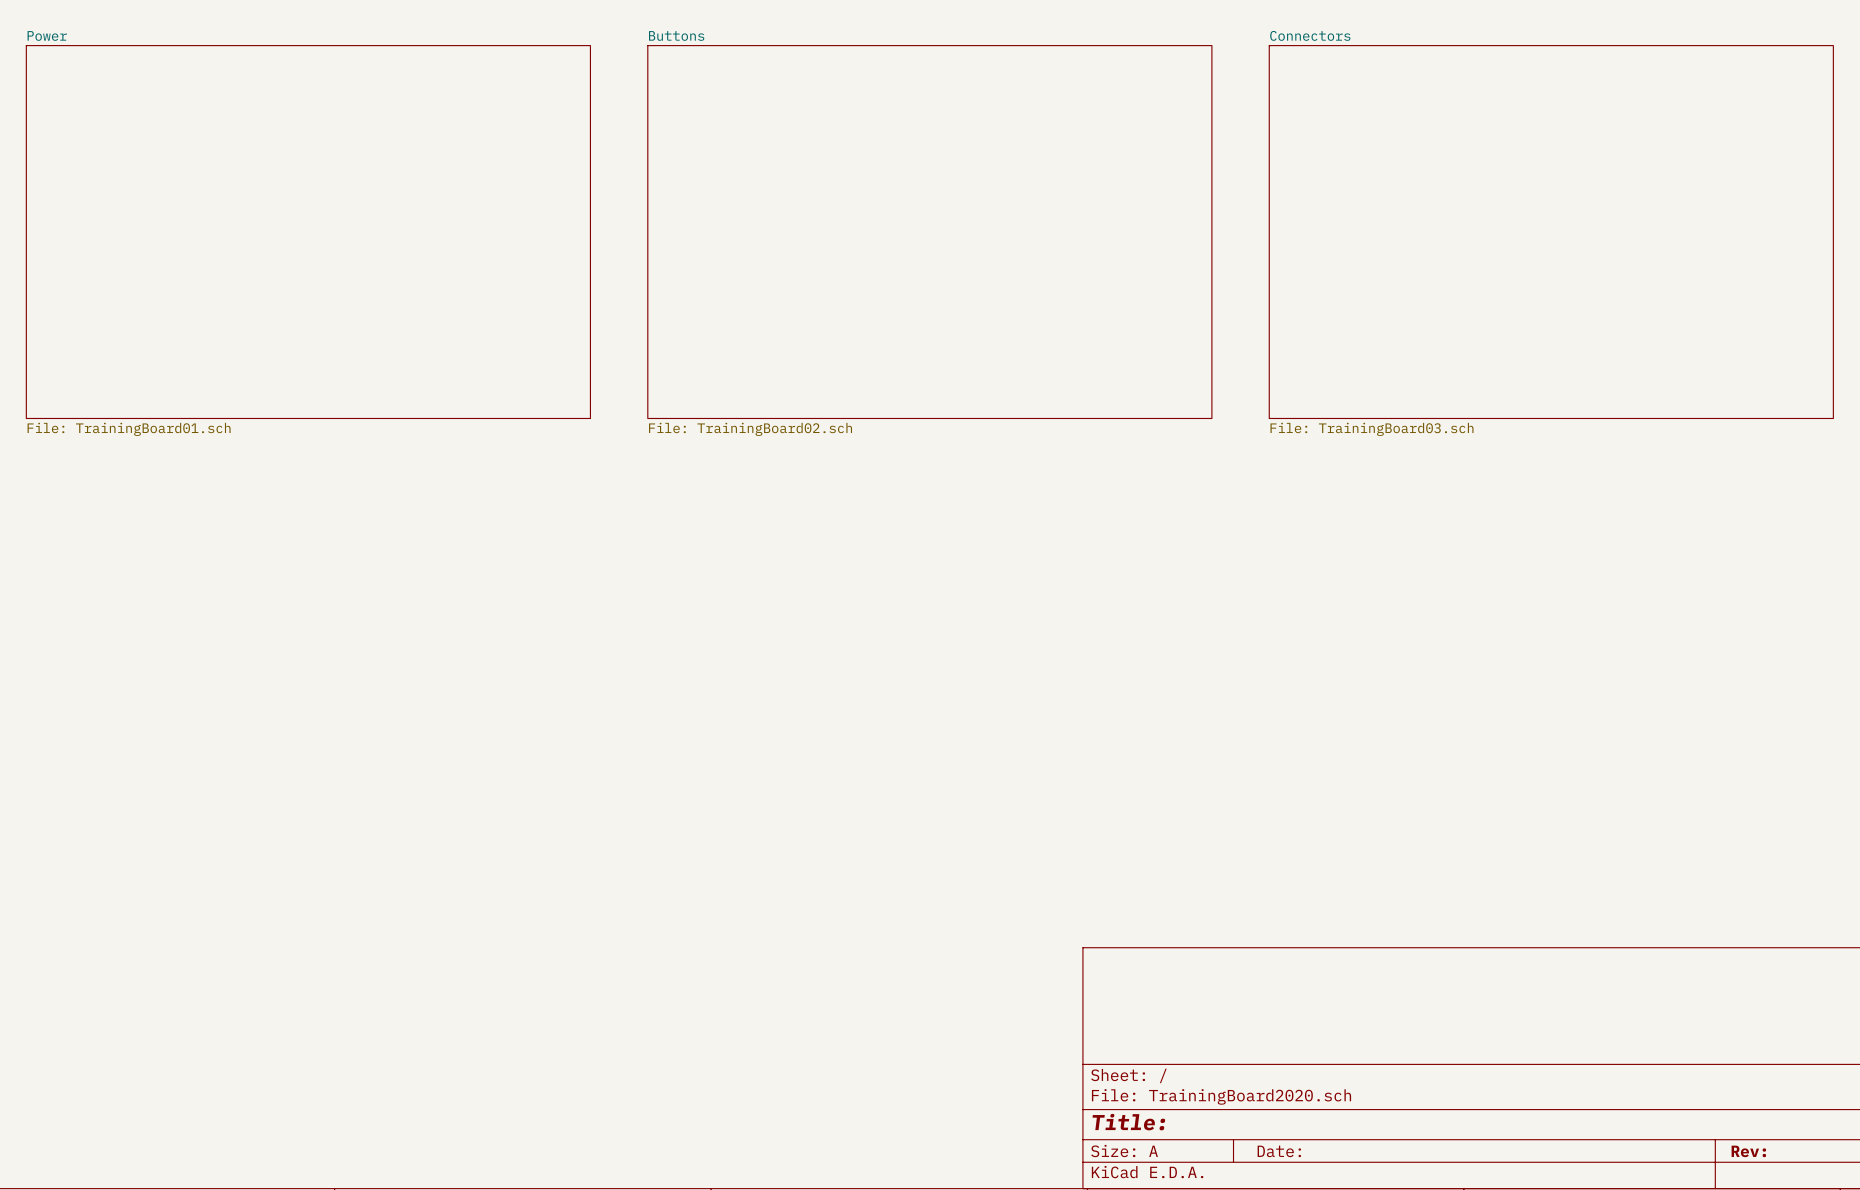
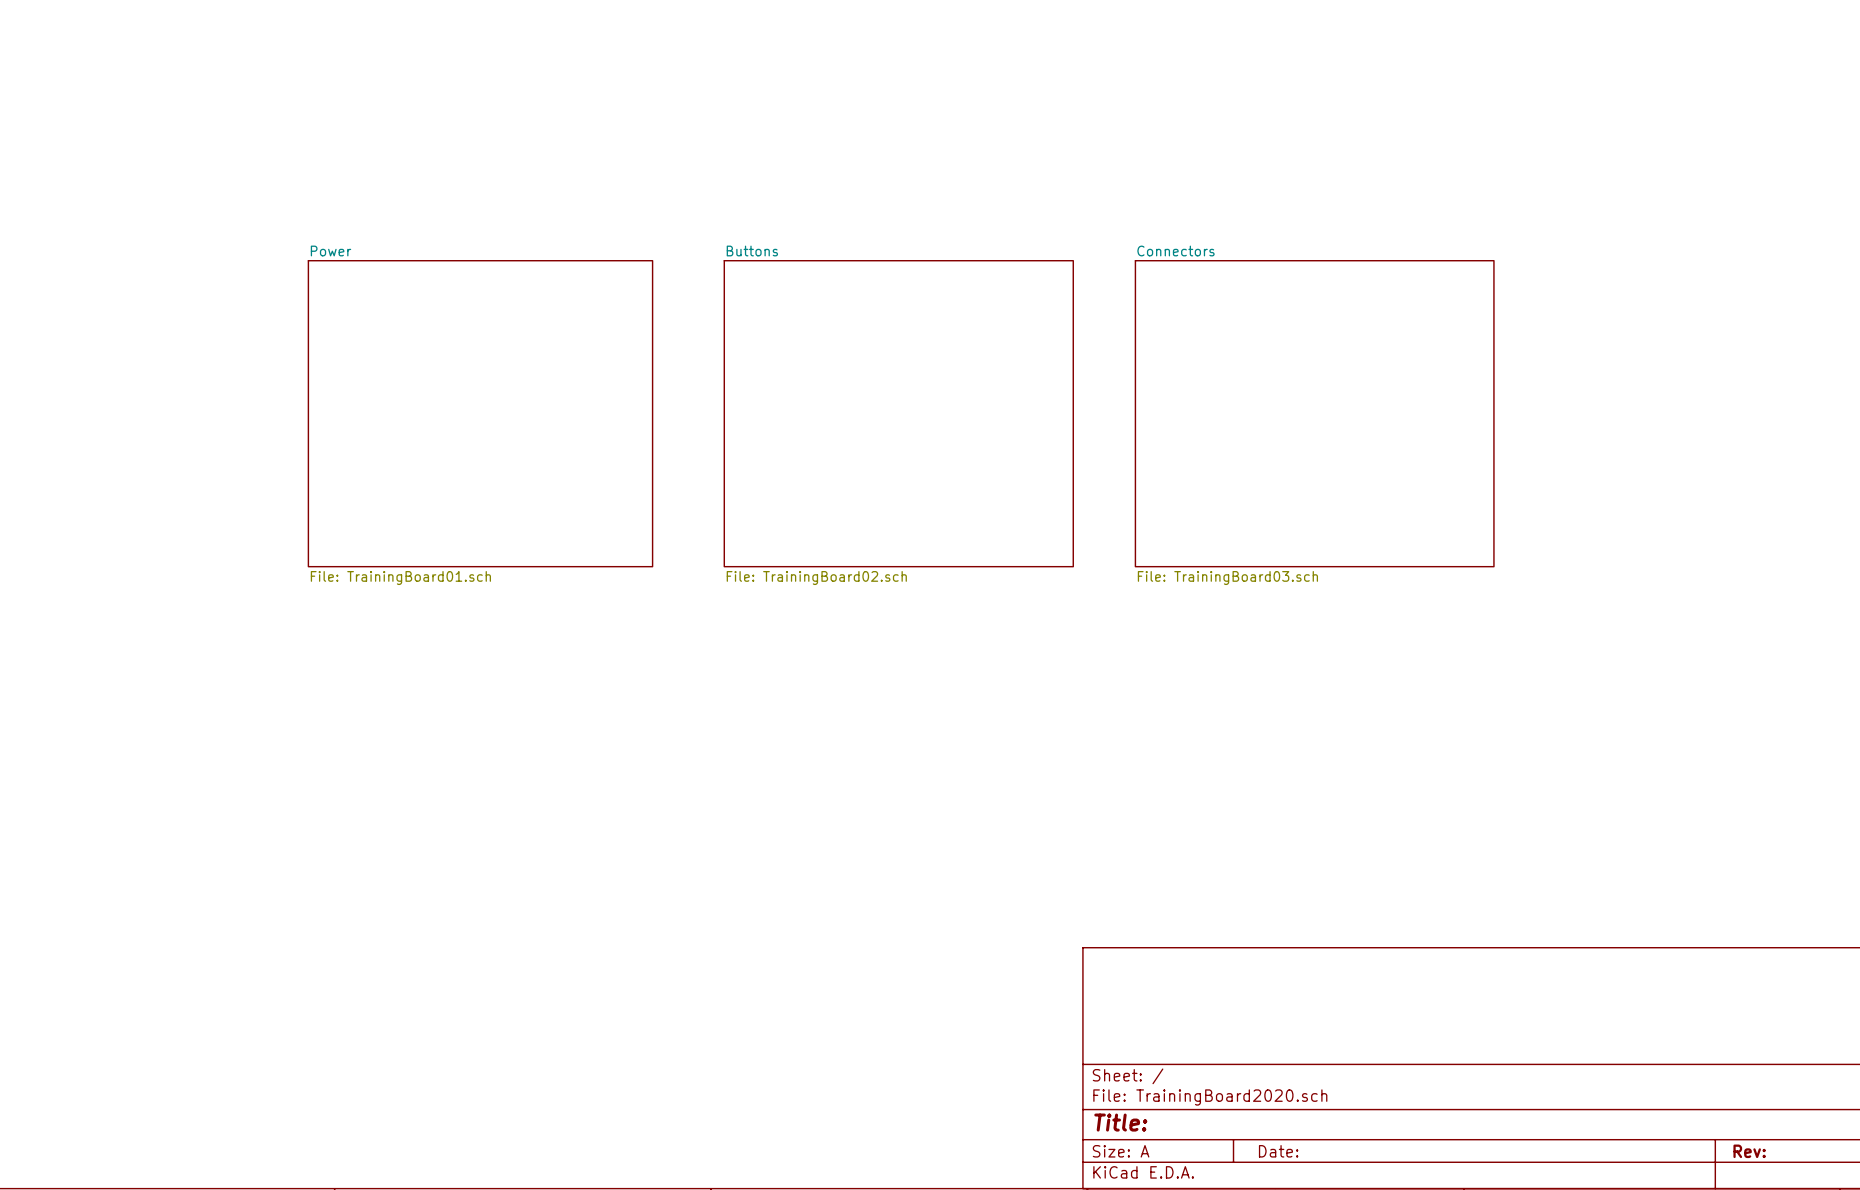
sheet Power: File: TrainingBoard01.sch (308, 232) -> none
sheet Buttons: File: TrainingBoard02.sch (929, 232) -> none
sheet Connectors: File: TrainingBoard03.sch (1551, 232) -> none
sheet Power: none -> File: TrainingBoard01.sch (480, 413)
sheet Buttons: none -> File: TrainingBoard02.sch (898, 413)
sheet Connectors: none -> File: TrainingBoard03.sch (1314, 413)

